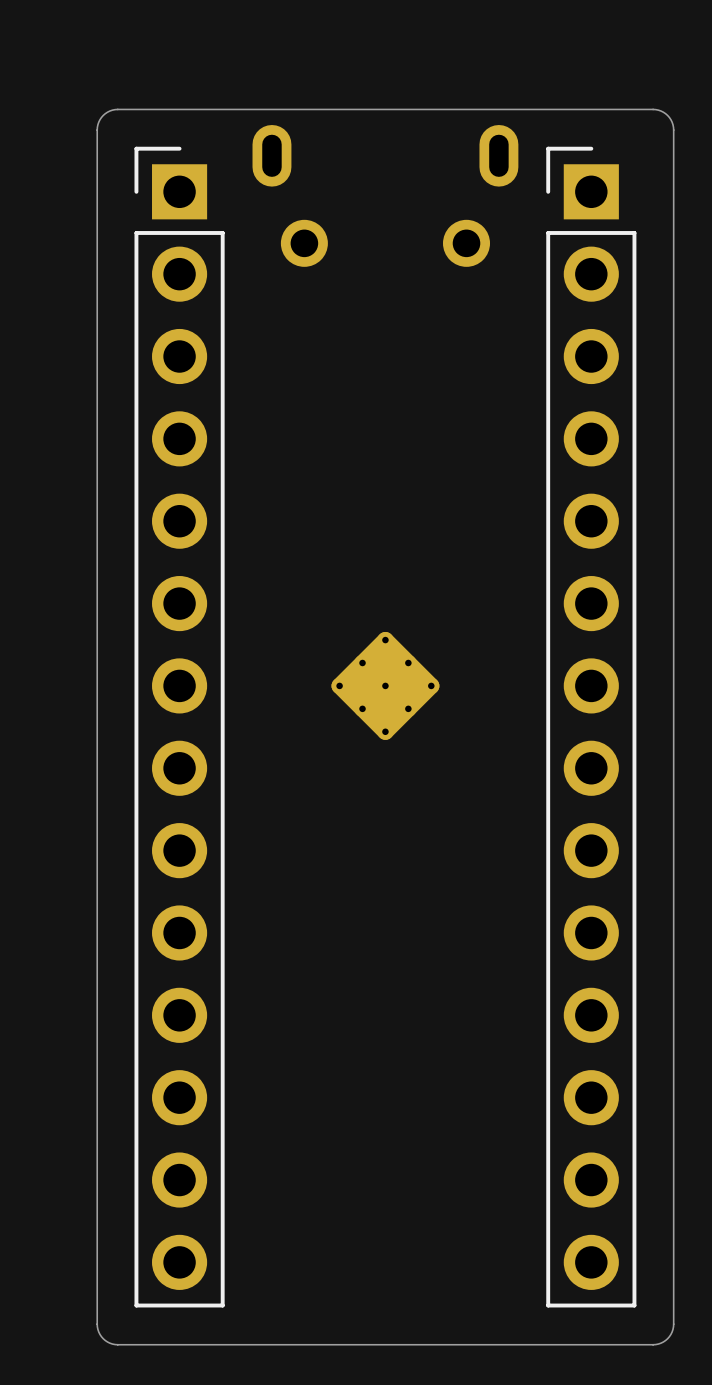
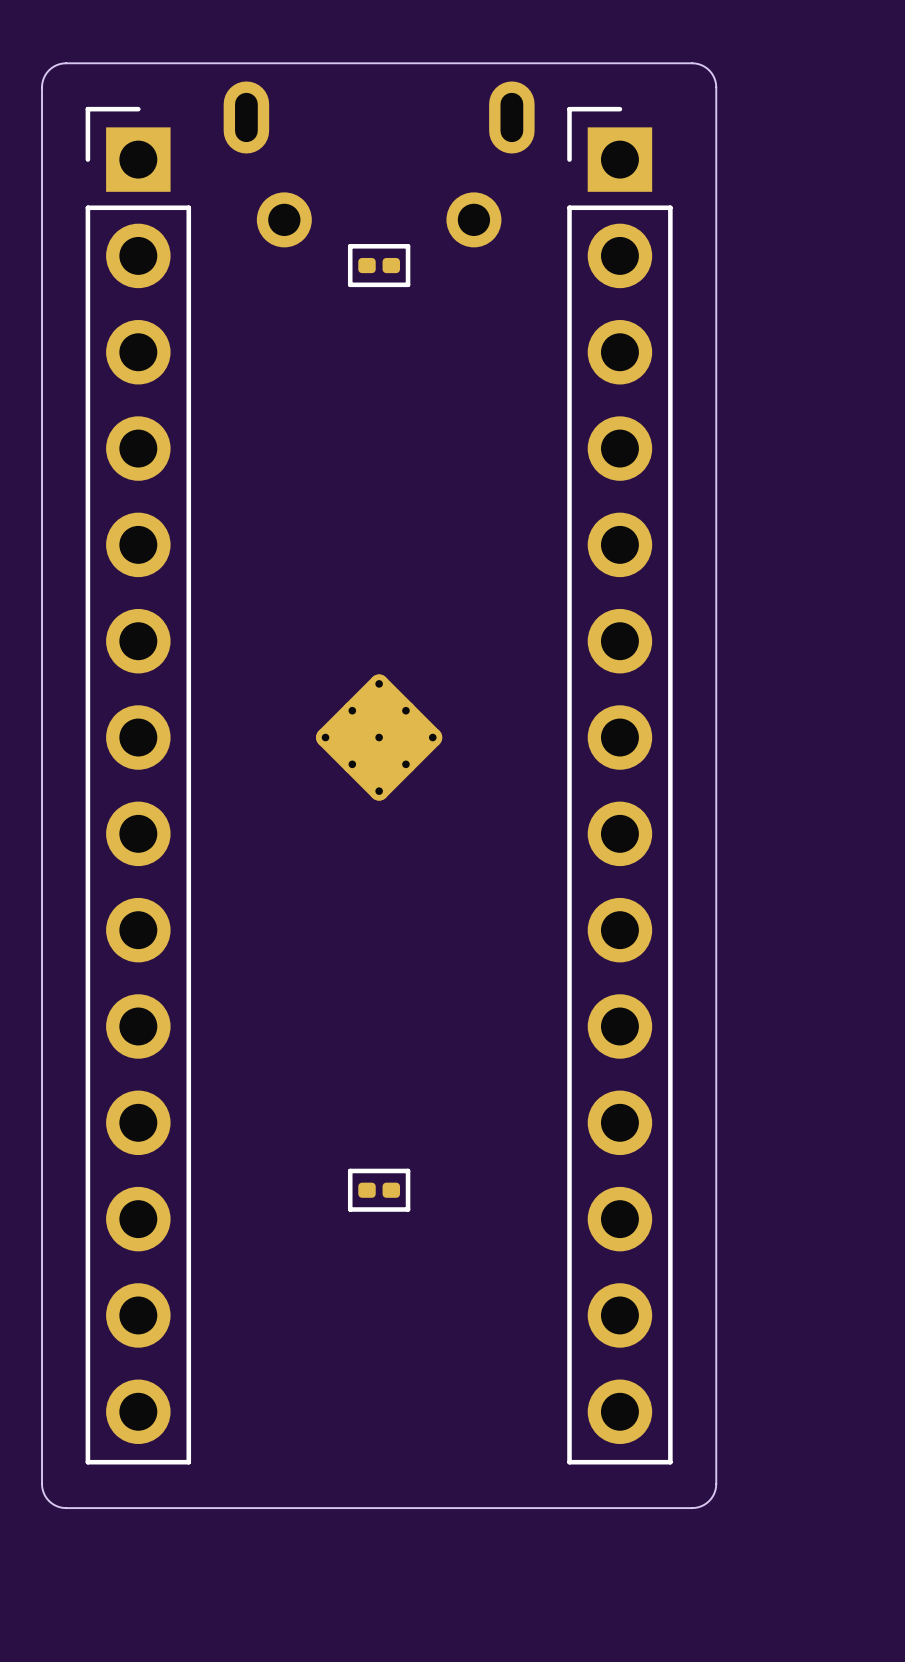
line: none -> (408, 246) (350, 246) (350, 284) (408, 284) (408, 246)
part: none -> (379, 265)
line: none -> (408, 1170) (408, 1209) (350, 1209) (350, 1170) (408, 1170)
part: none -> (379, 1190)

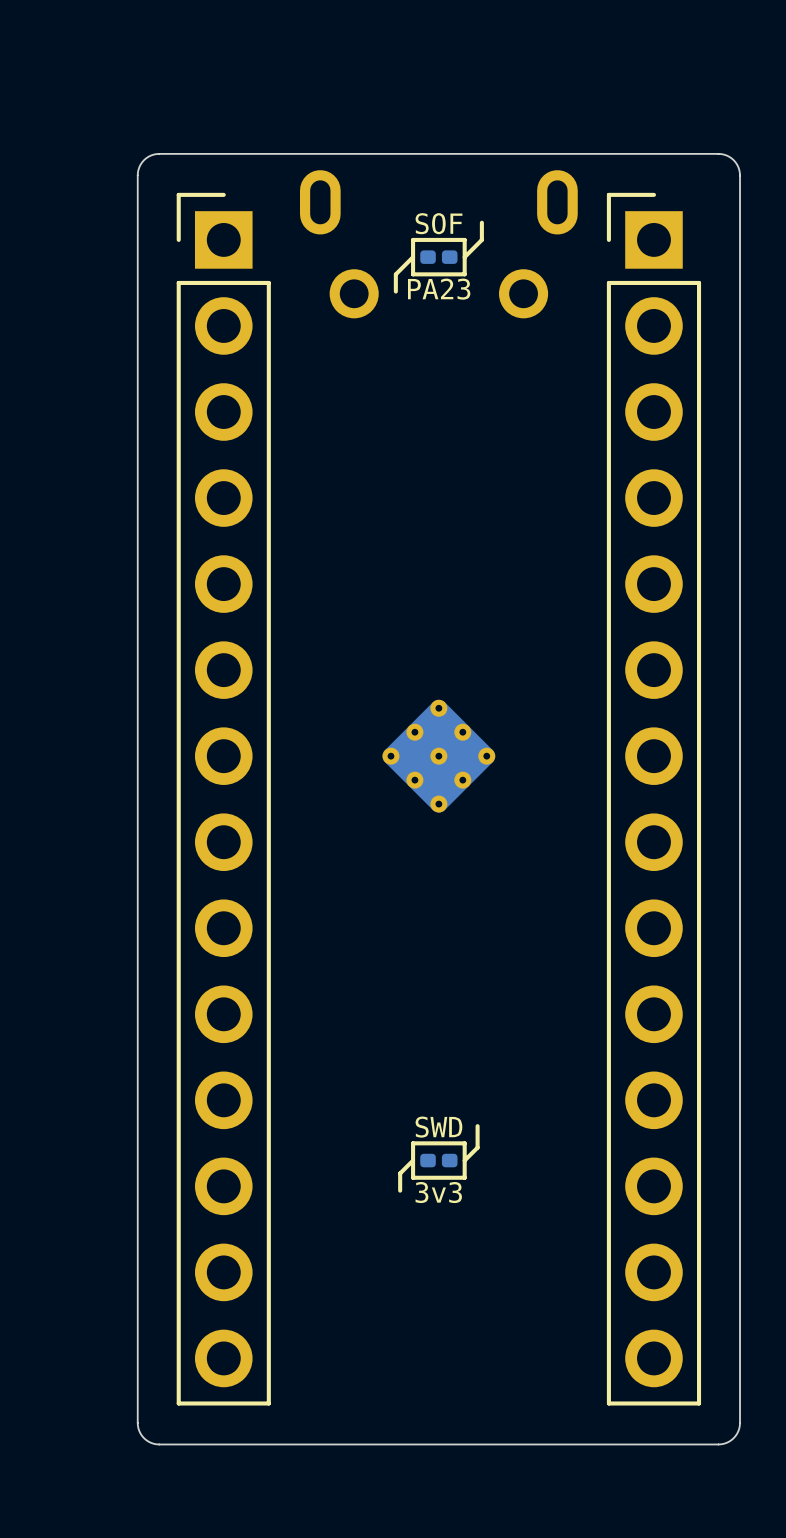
line: none -> (481, 222) (481, 239) (464, 257)
text: none -> SOF (439, 223)
line: none -> (413, 257) (395, 274) (395, 291)
text: none -> PA23 (439, 289)
line: (408, 246) (350, 246) (350, 284) (408, 284) (408, 246) -> (464, 239) (413, 239) (413, 274) (464, 274) (464, 239)
part position: (379, 265) -> (438, 257)
line: none -> (477, 1126) (477, 1147) (464, 1160)
text: none -> SWD (438, 1127)
line: none -> (413, 1160) (400, 1173) (400, 1190)
text: none -> 3v3 (438, 1192)

